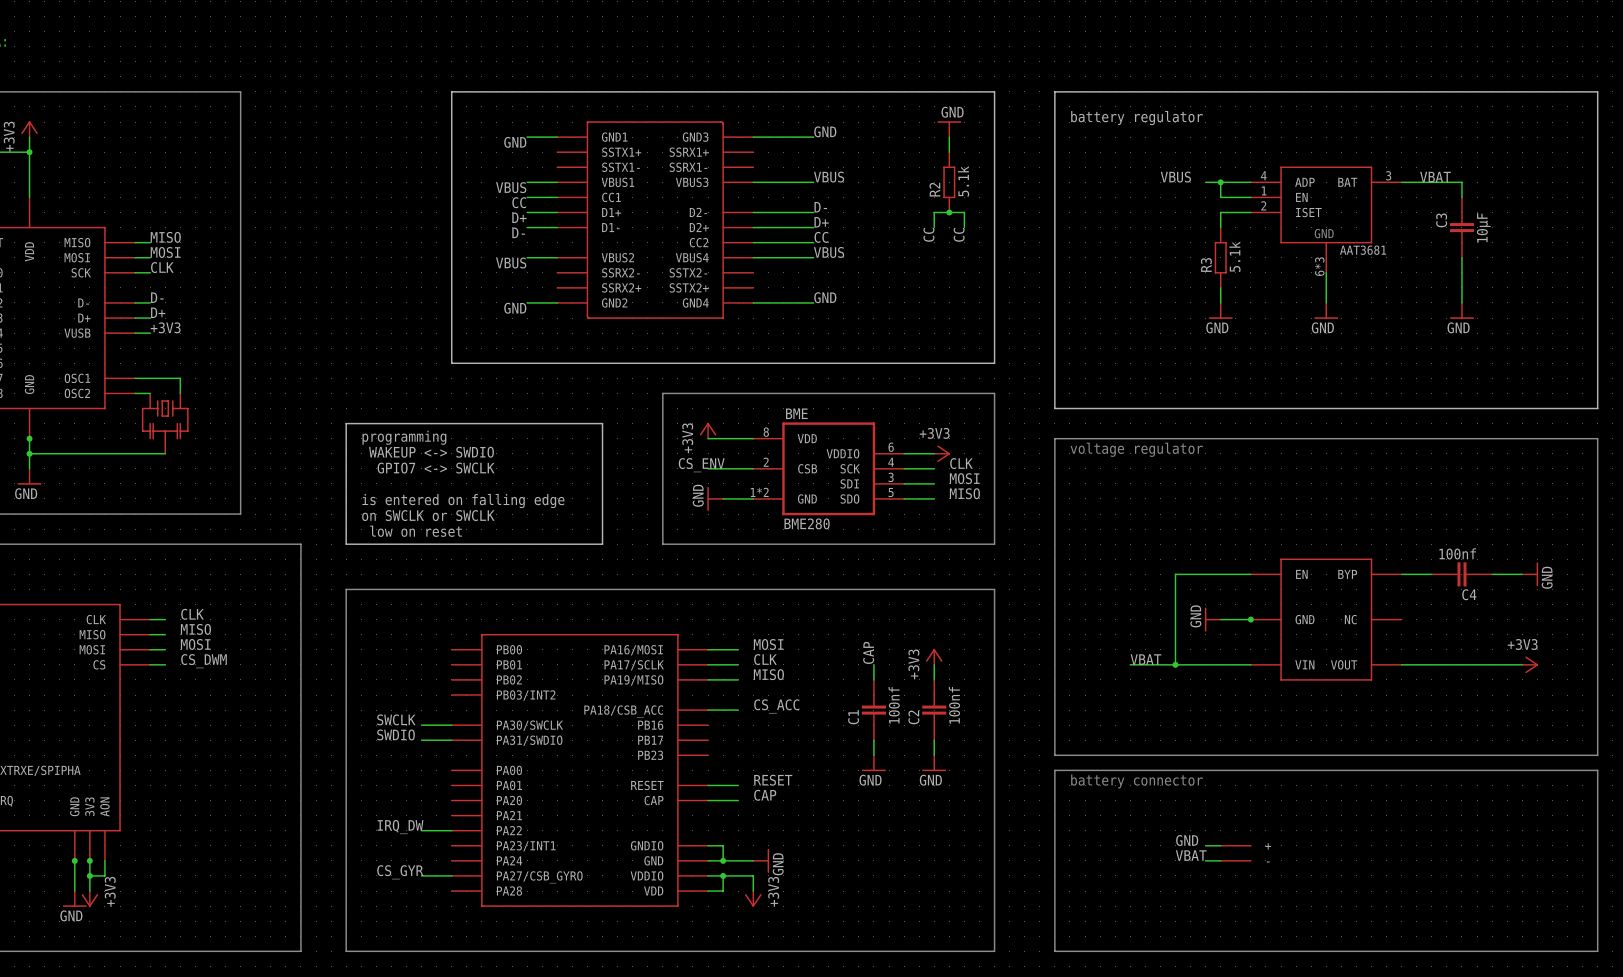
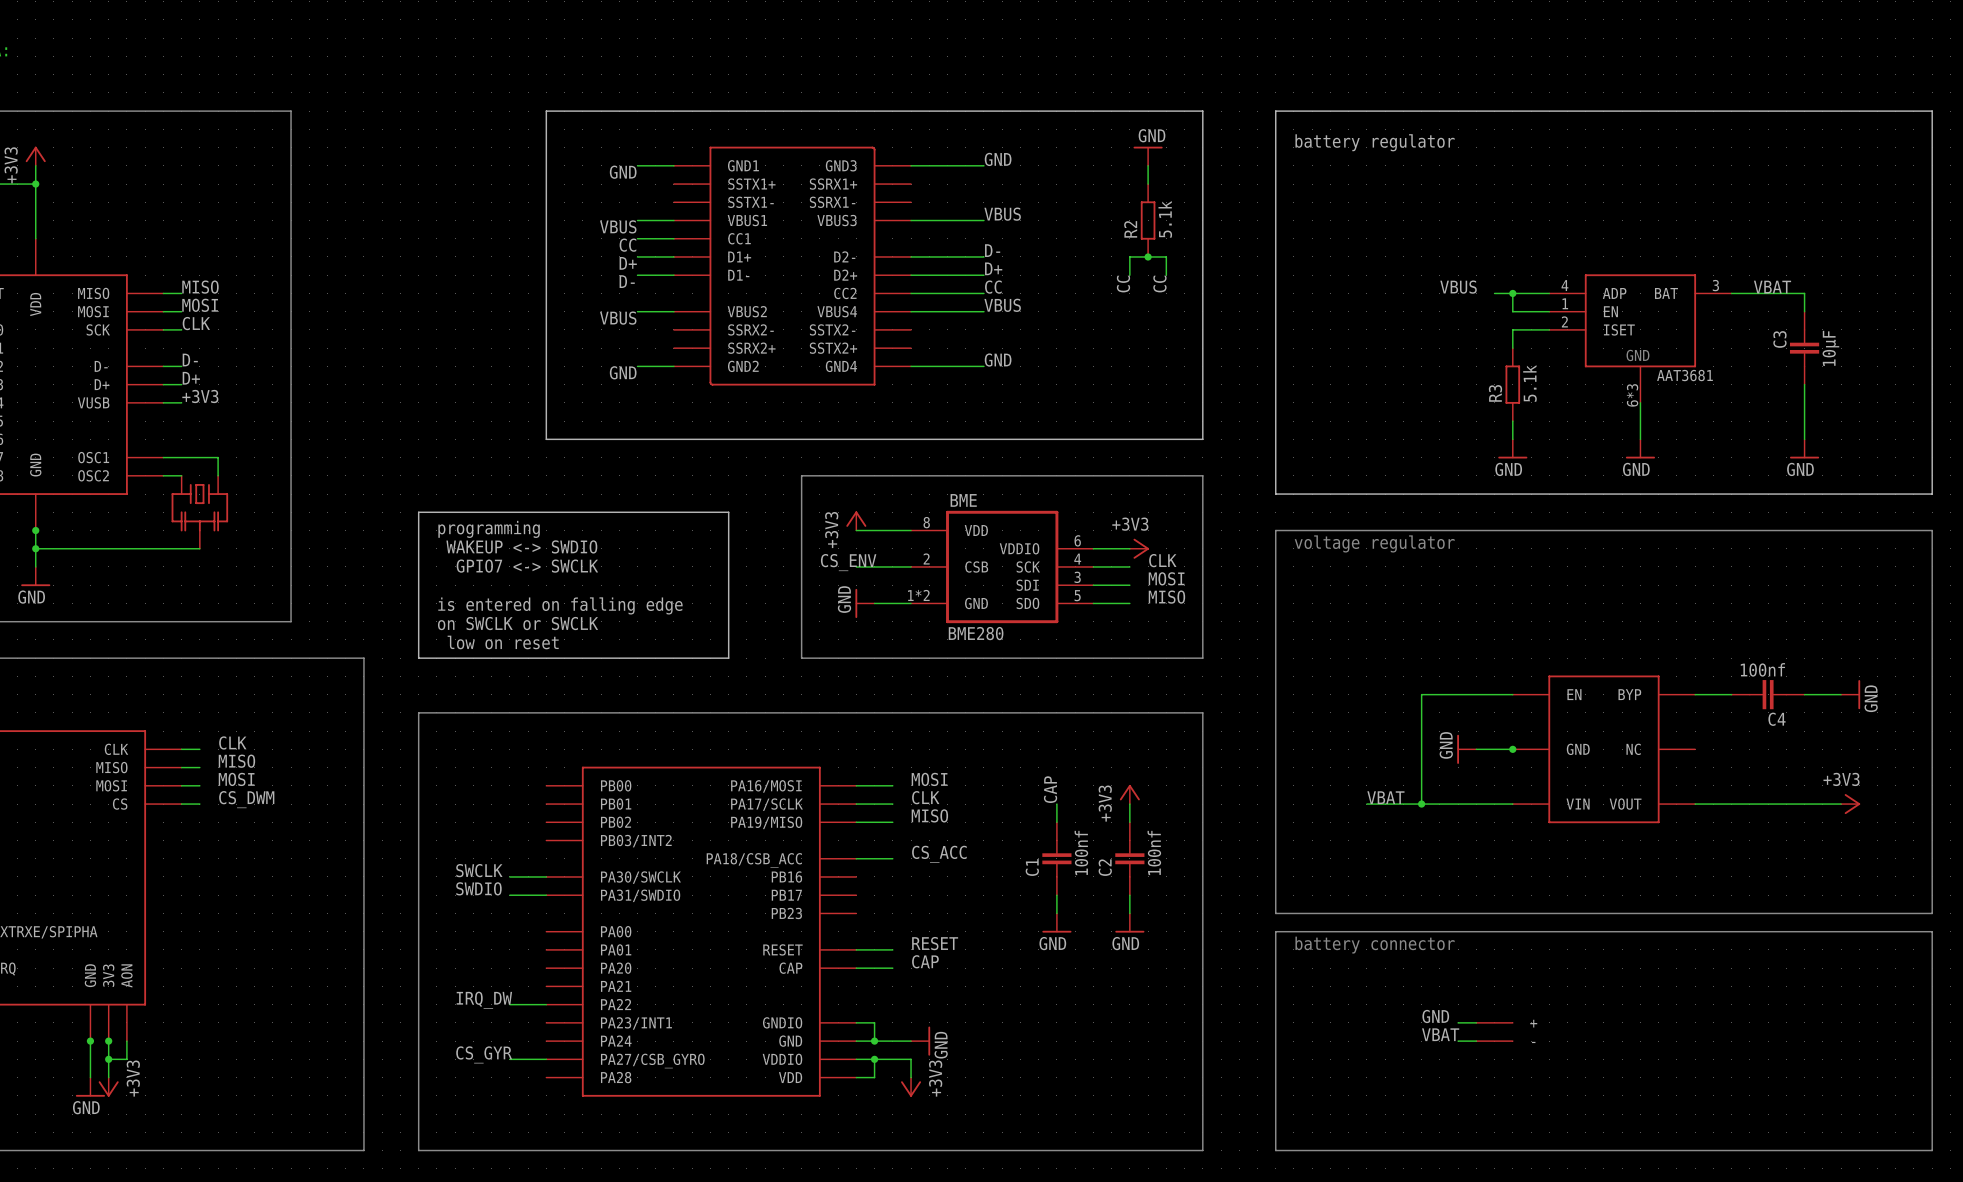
label position: VBUS (1175, 177) -> VBUS (1458, 287)
label position: VBAT (1435, 177) -> VBAT (1772, 287)
wire: (1205, 182) (1250, 182) -> (1494, 293) (1549, 293)
wire: (1220, 182) (1220, 197) (1250, 197) -> (1512, 293) (1512, 311) (1549, 311)
junction: (1220, 182) -> none
wire: (1401, 182) (1461, 182) (1461, 197) -> (1731, 293) (1804, 293) (1804, 311)
wire: (1250, 212) (1220, 212) (1220, 227) -> (1549, 329) (1512, 329) (1512, 348)
AAT3681 position: (1326, 219) -> (1640, 338)
C3 position: (1461, 227) -> (1804, 348)
junction: none -> (1512, 293)
R3 position: (1220, 257) -> (1512, 384)
wire: (1461, 257) (1461, 302) -> (1804, 384) (1804, 439)
wire: (1326, 272) (1326, 302) -> (1640, 402) (1640, 439)
wire: (1220, 287) (1220, 302) -> (1512, 421) (1512, 439)
power symbol: GND (1220, 310) -> none
power symbol: GND (1326, 310) -> none
power symbol: GND (1461, 310) -> none
power symbol: none -> GND (1512, 448)
power symbol: none -> GND (1640, 448)
power symbol: none -> GND (1804, 448)

